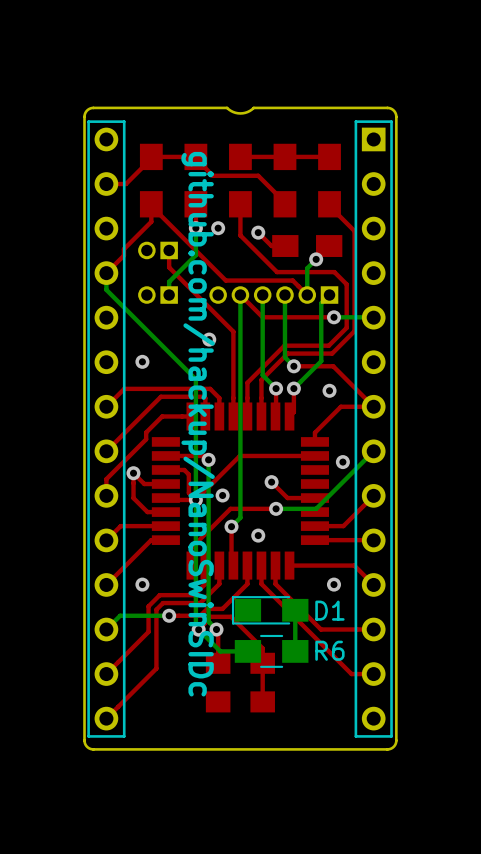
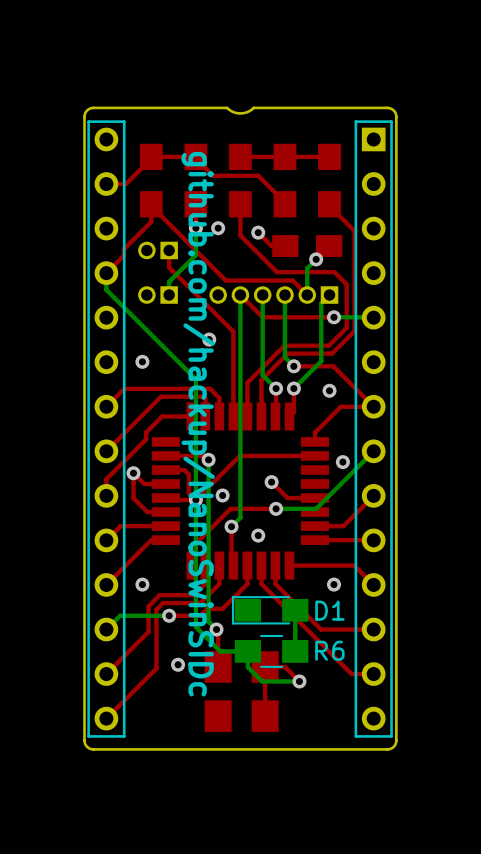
top track: (198, 629) (210, 616) (231, 616) (262, 648) (262, 701) -> none
via position: (198, 629) -> (178, 664)
bottom track: none -> (247, 651) (247, 667) (262, 681) (299, 681)
part footprint: [205, 652, 275, 713] -> [204, 651, 279, 732]
top track: none -> (299, 681) (284, 667) (265, 667) (265, 716)
via: none -> (299, 681)

